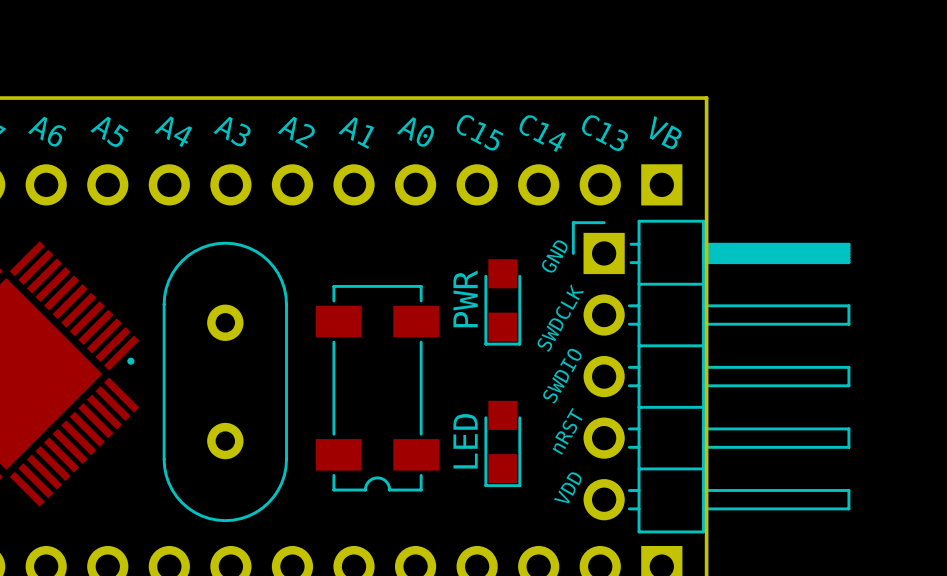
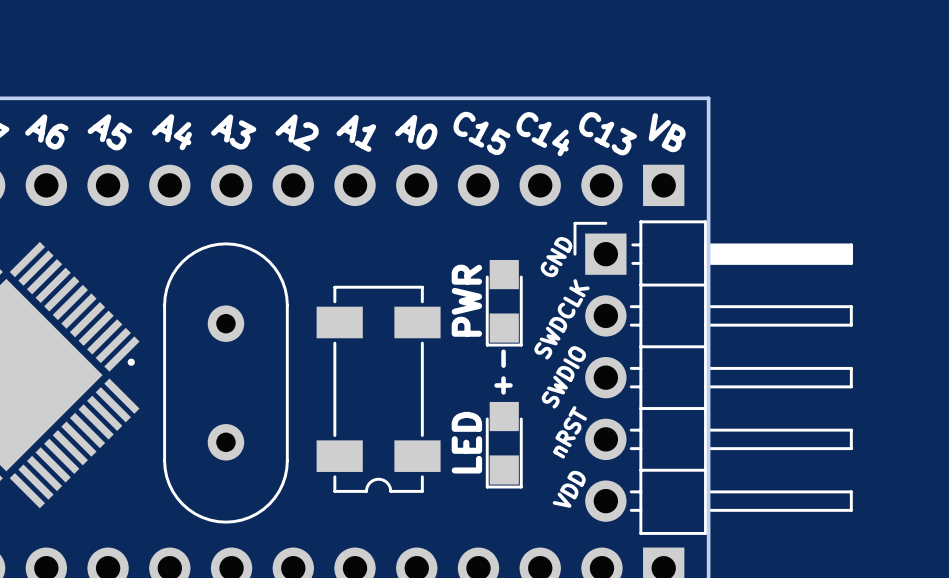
text: none -> - (503, 358)
text: none -> + (503, 385)

